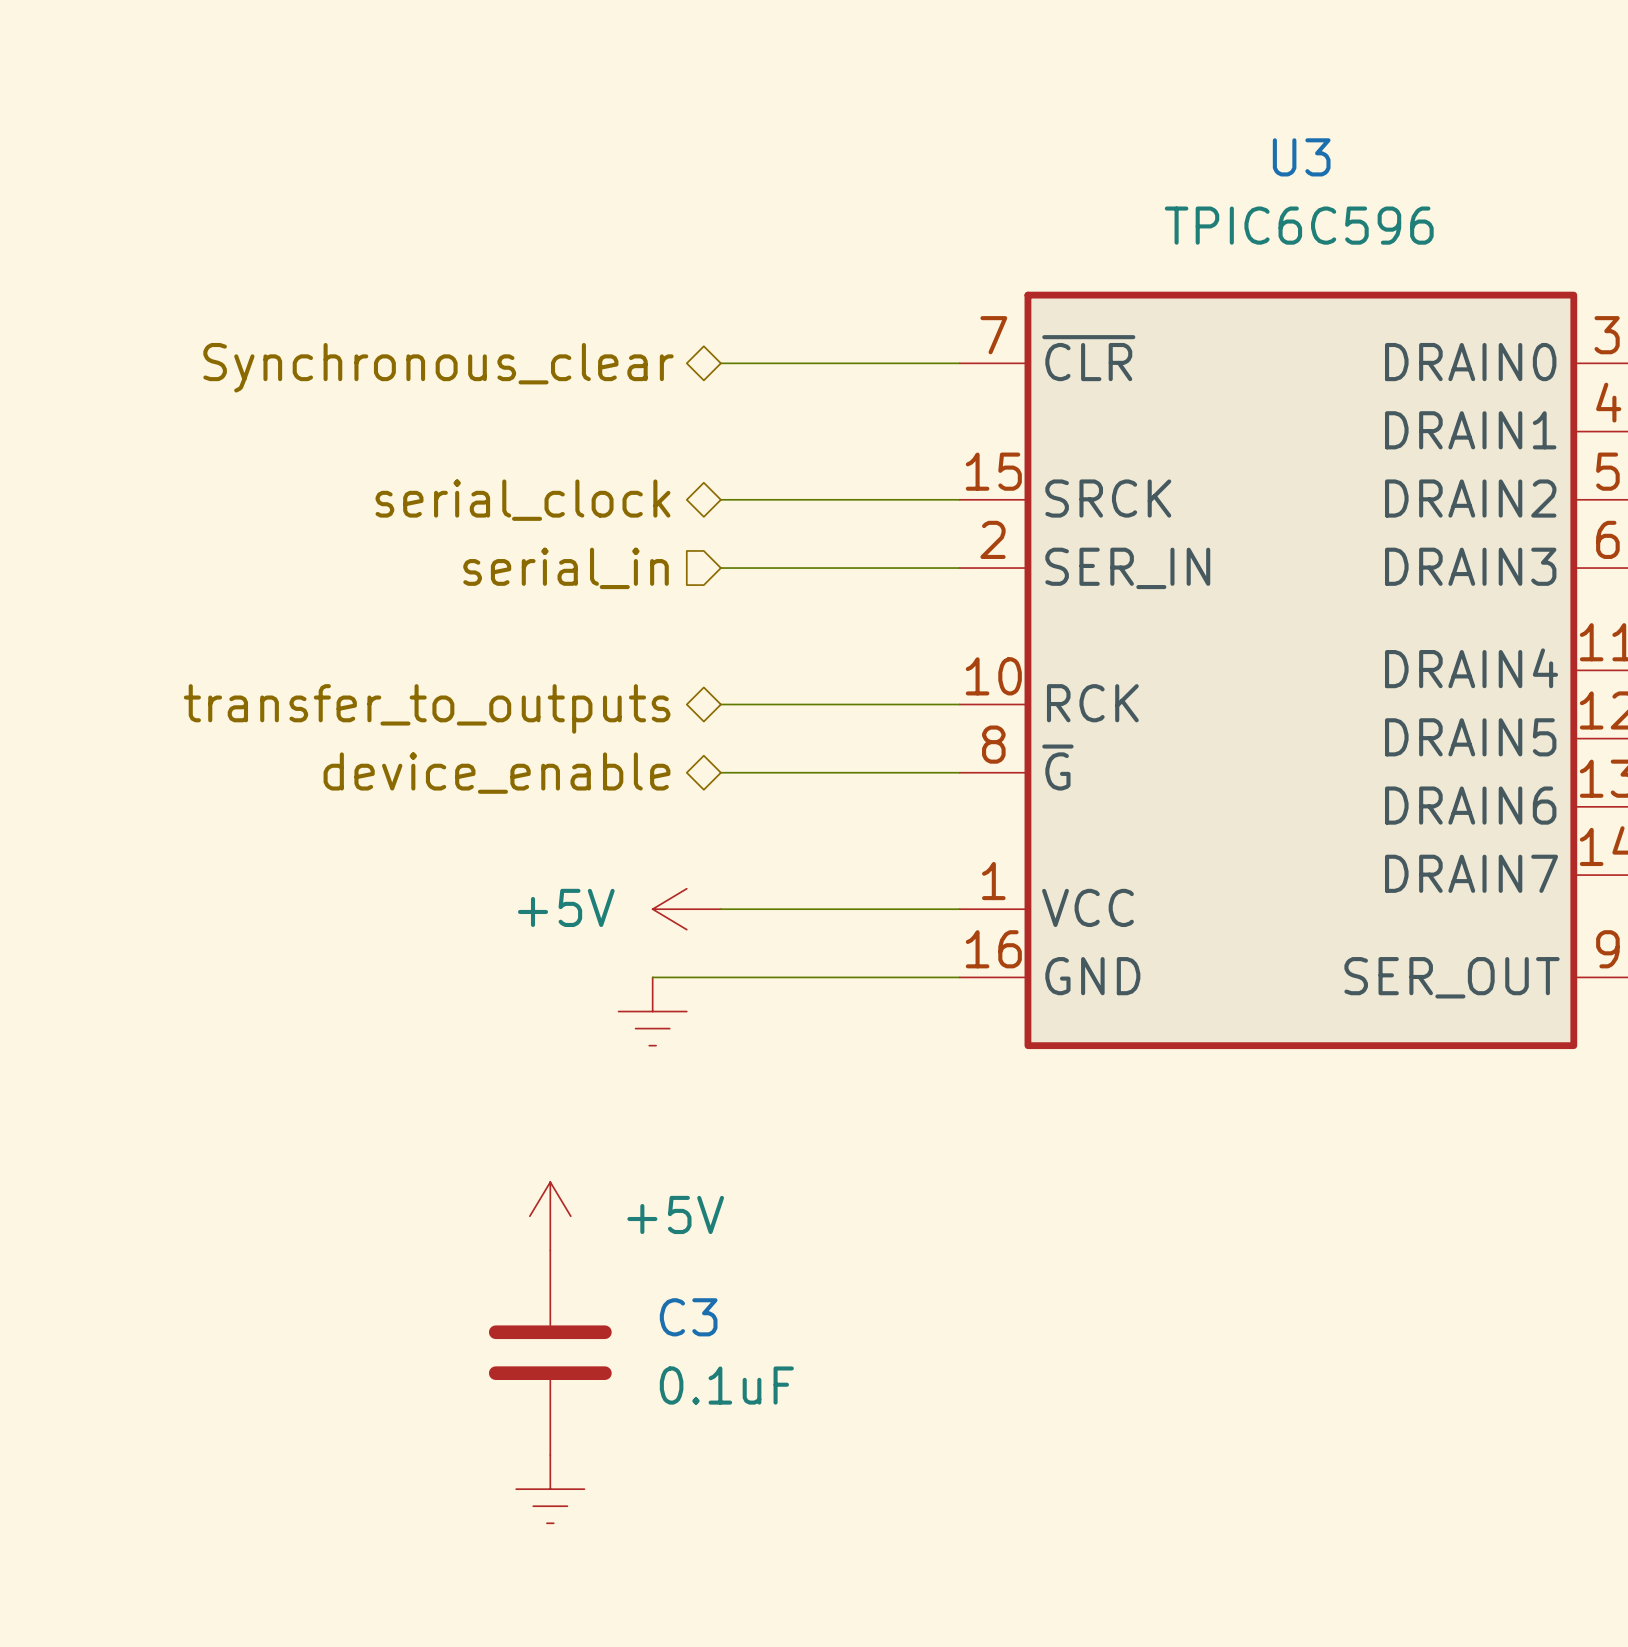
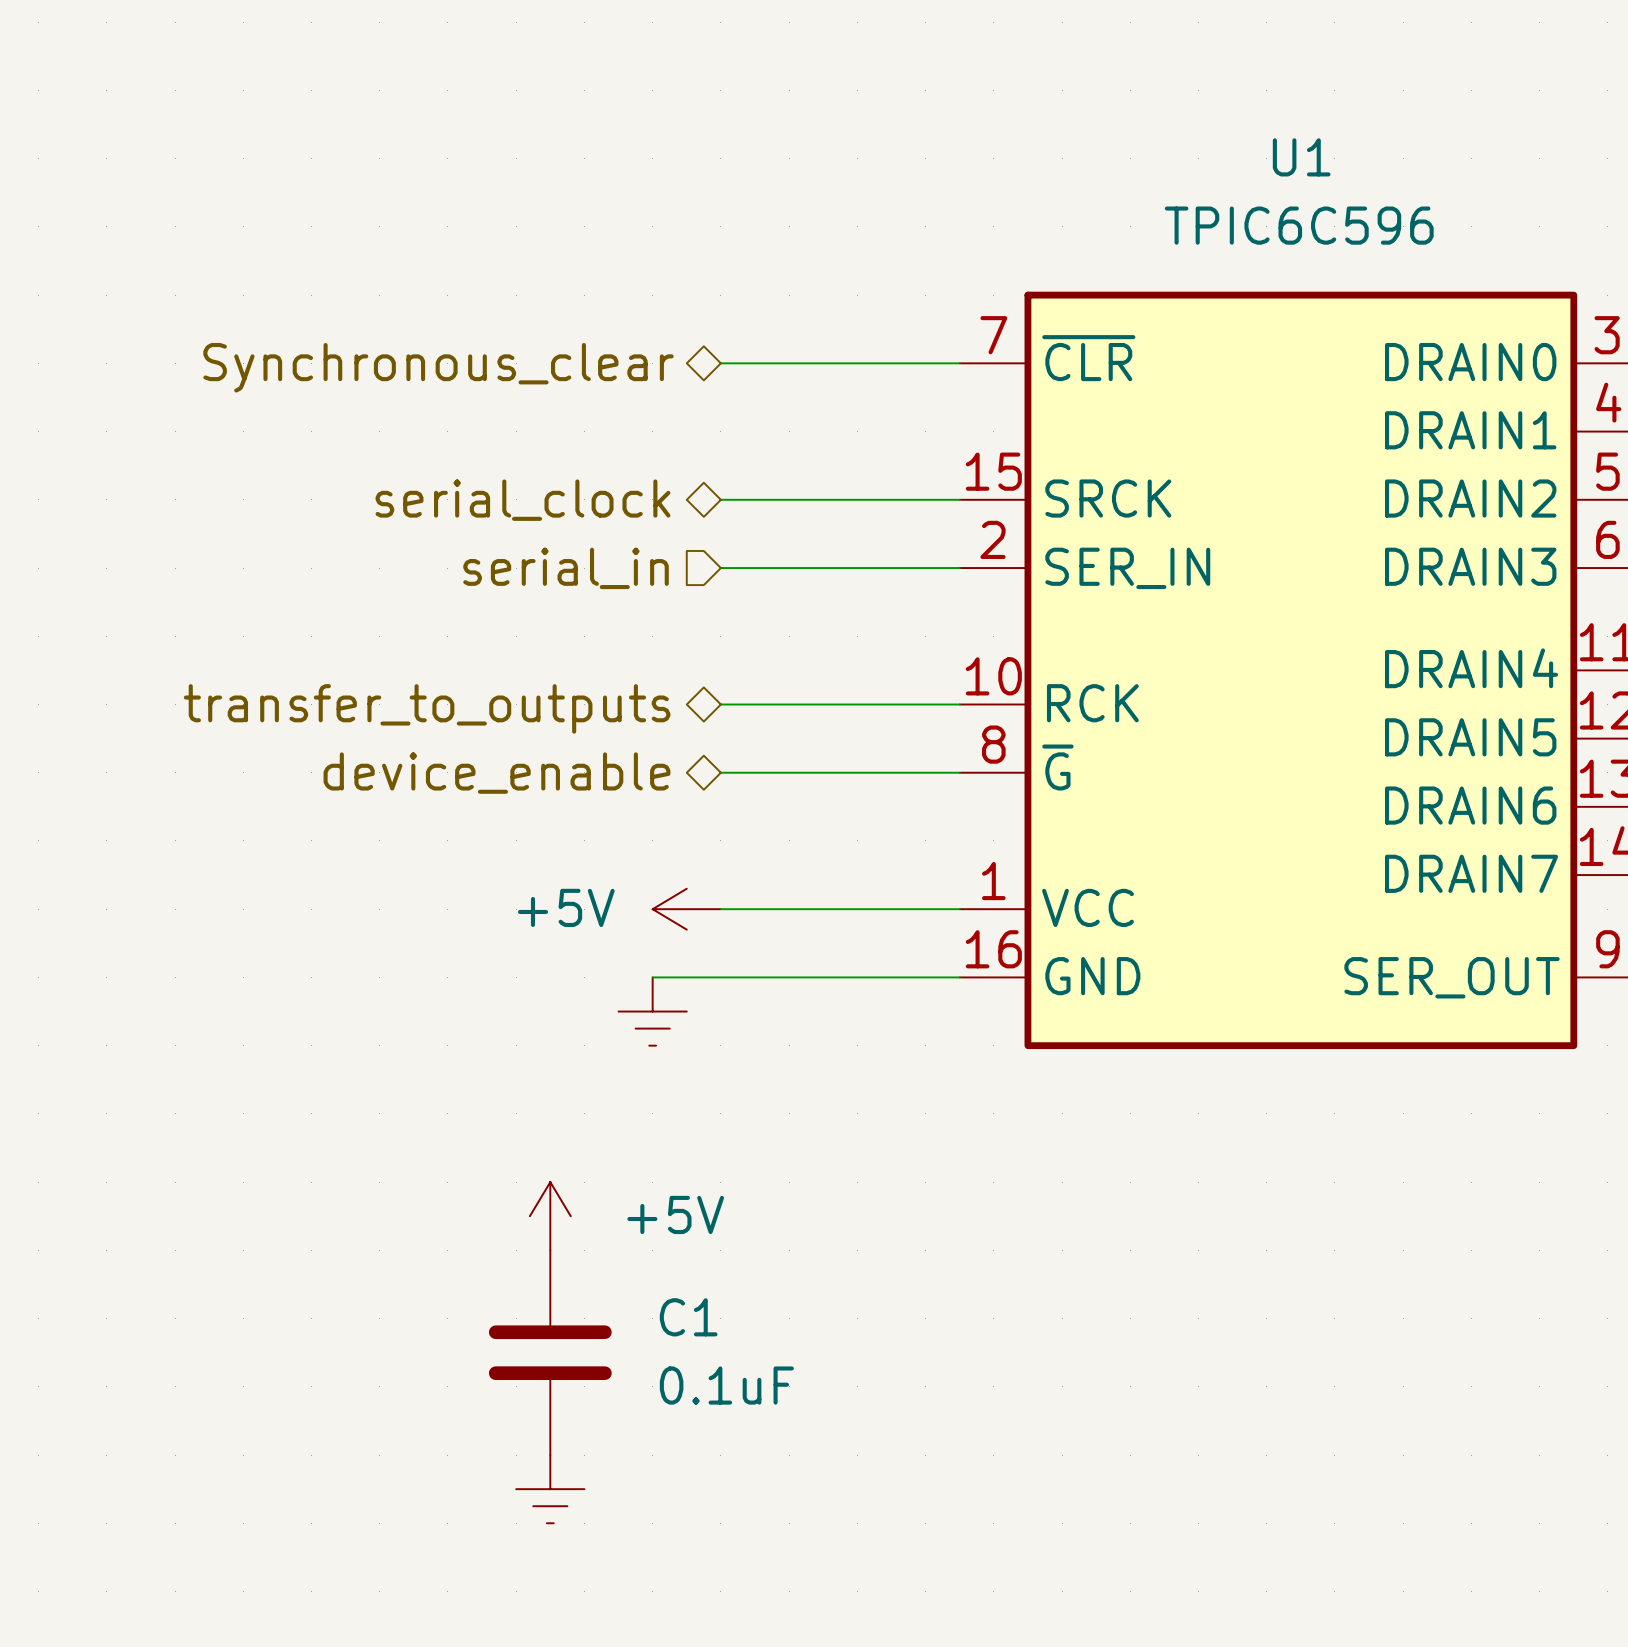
U3 name: U3 (1301, 157) -> U1 (1301, 157)
C3 name: C3 (688, 1317) -> C1 (688, 1317)

